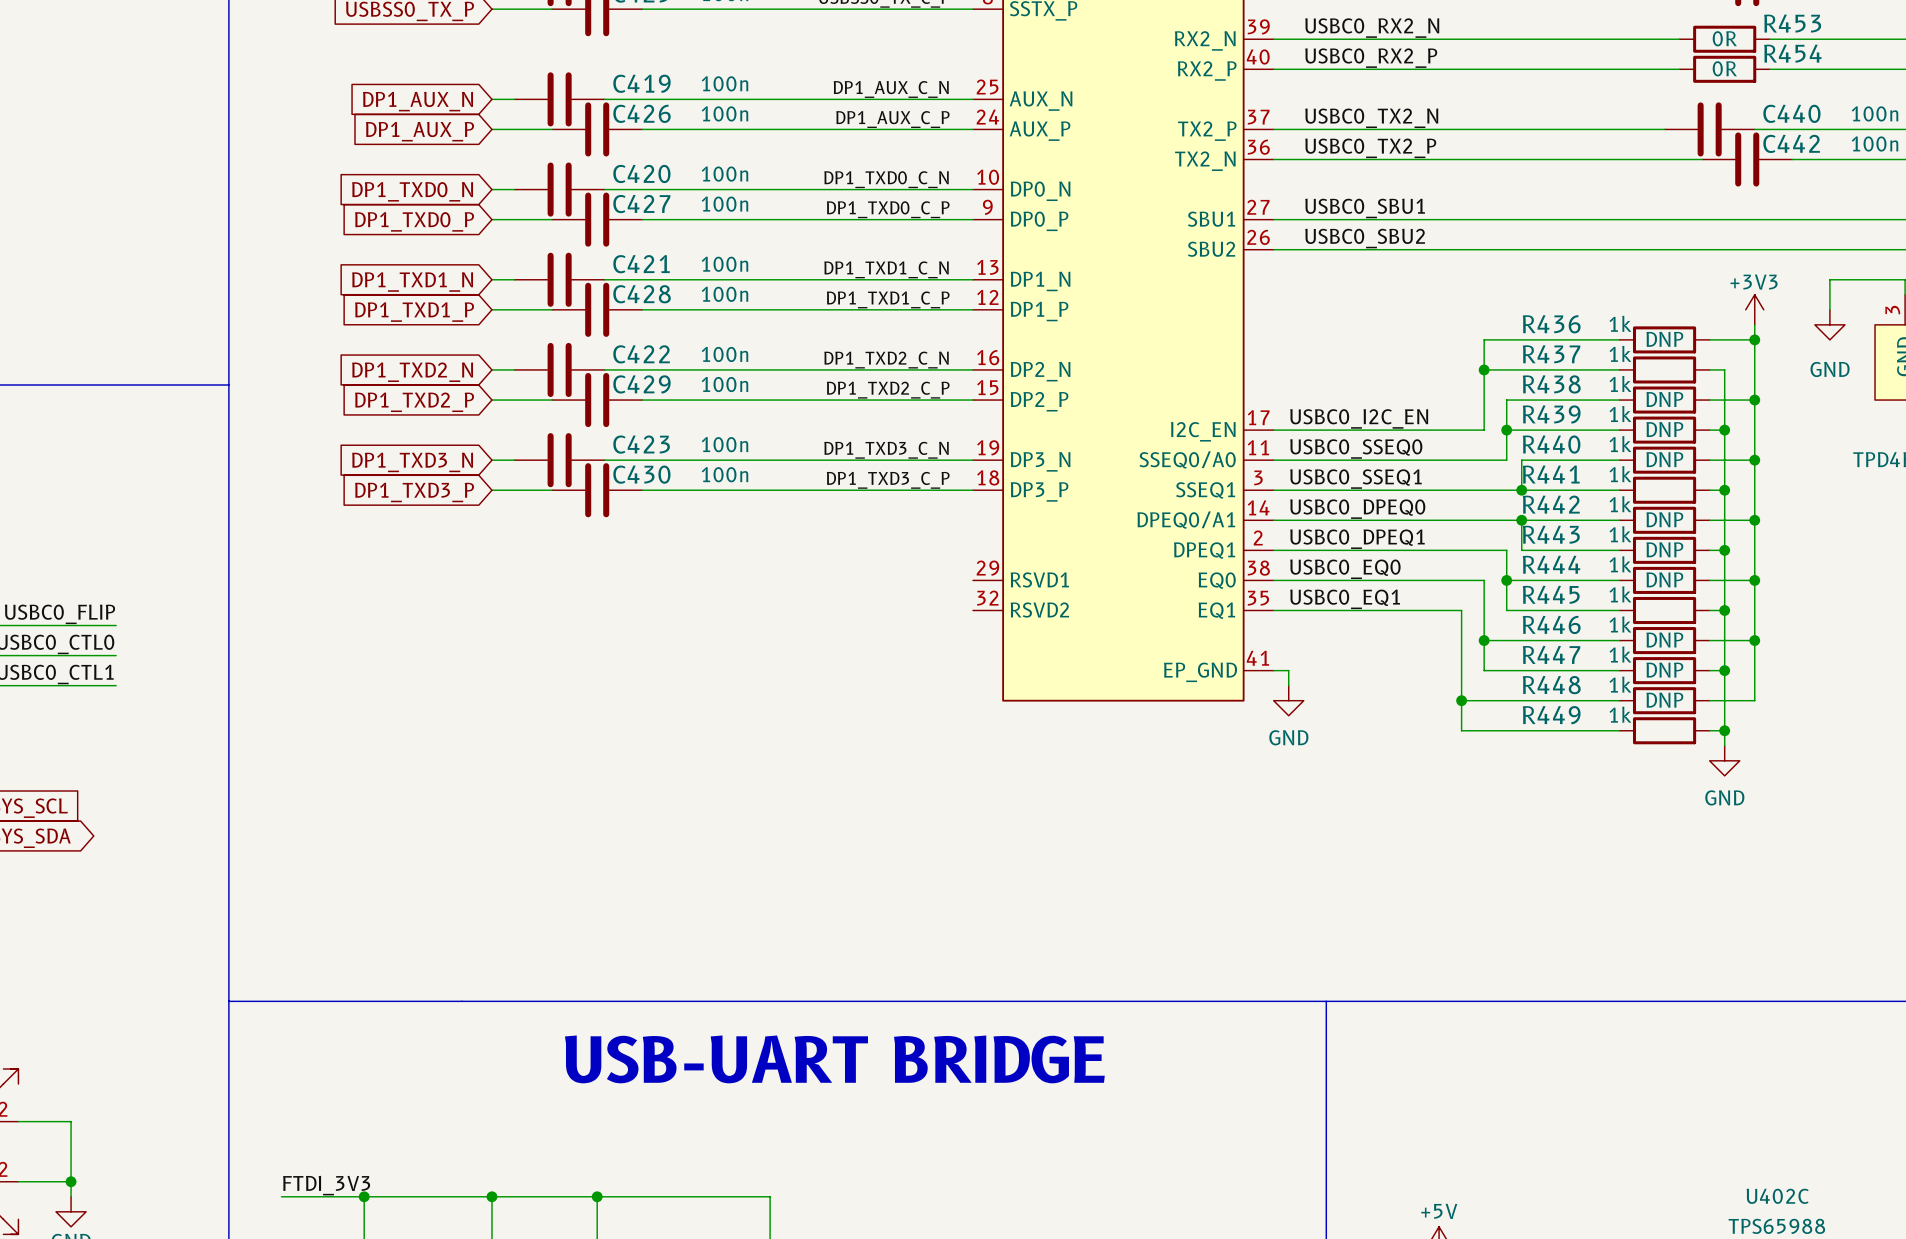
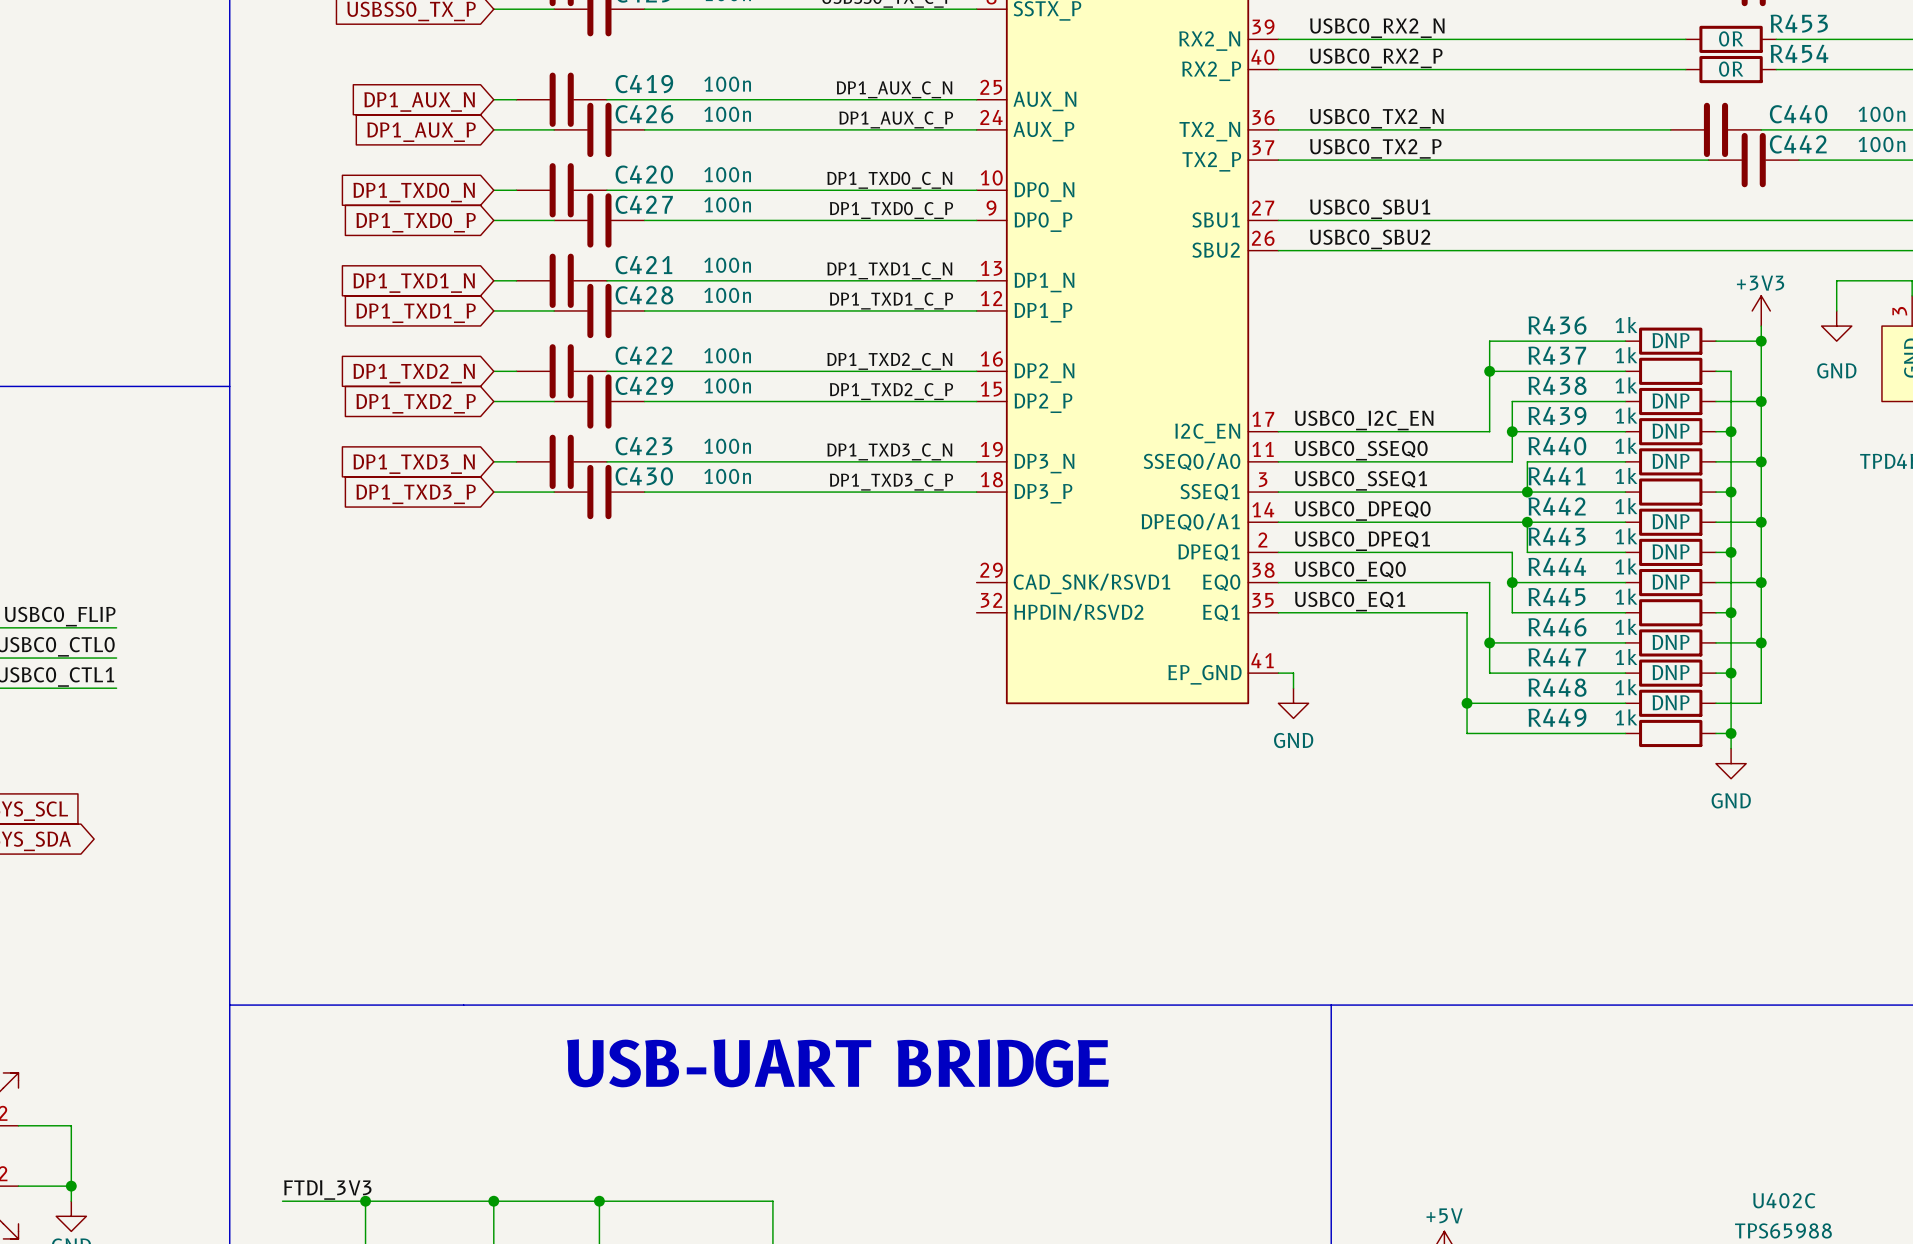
part pin number: 37 (1258, 117) -> 36 (1263, 117)
part pin name: TX2_P (1207, 131) -> TX2_N (1209, 131)
part pin number: 36 (1258, 147) -> 37 (1263, 147)
part pin name: TX2_N (1205, 161) -> TX2_P (1211, 161)
part pin name: RSVD1 (1039, 579) -> CAD_SNK/RSVD1 (1091, 583)
part pin name: RSVD2 (1039, 610) -> HPDIN/RSVD2 (1078, 612)

